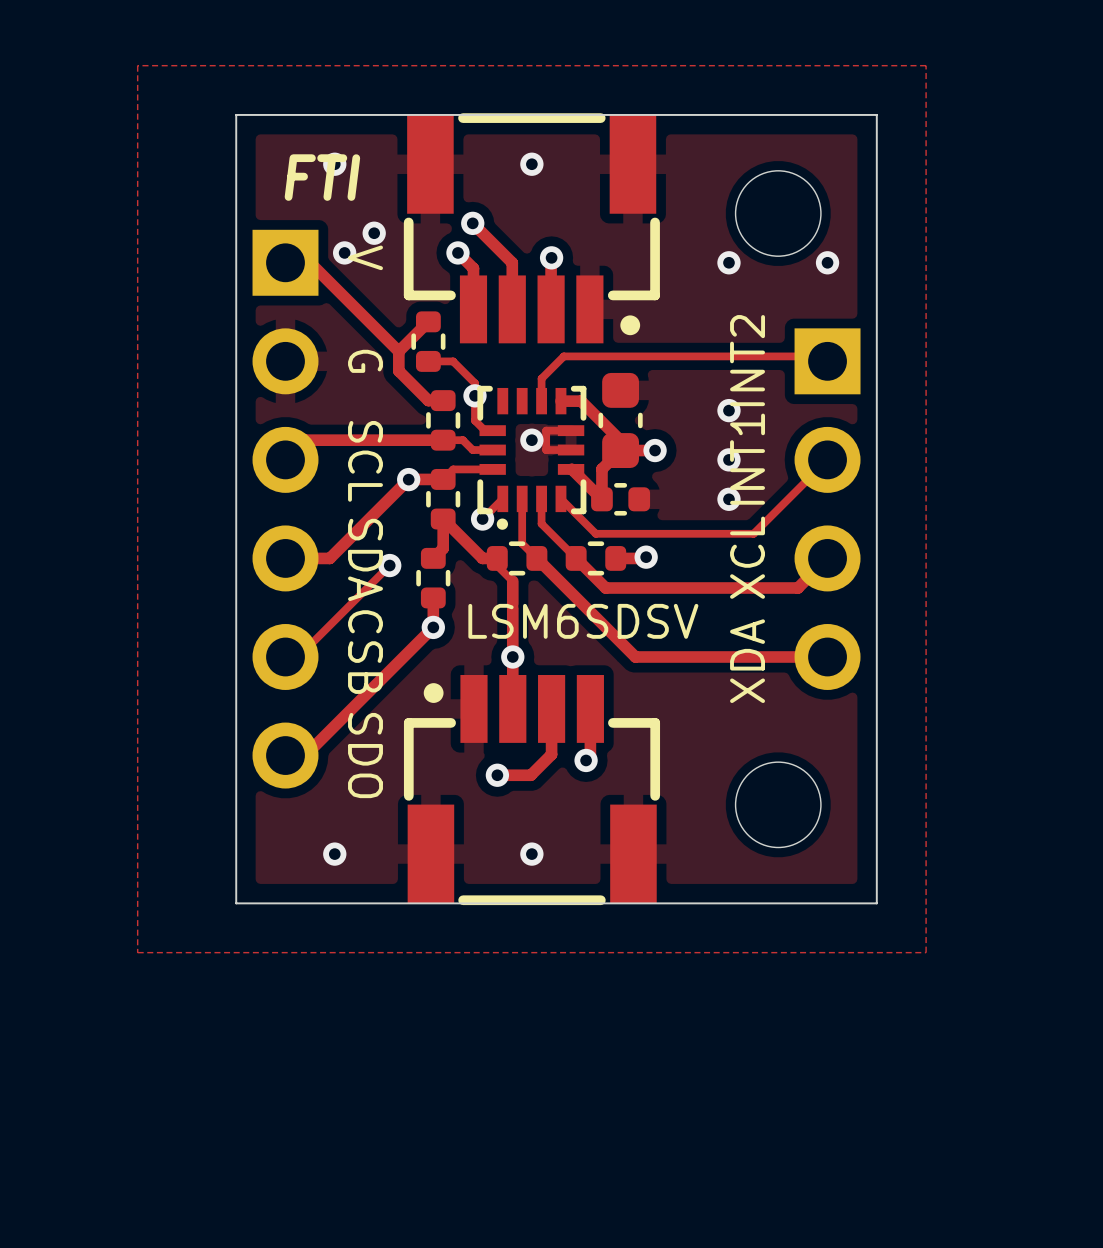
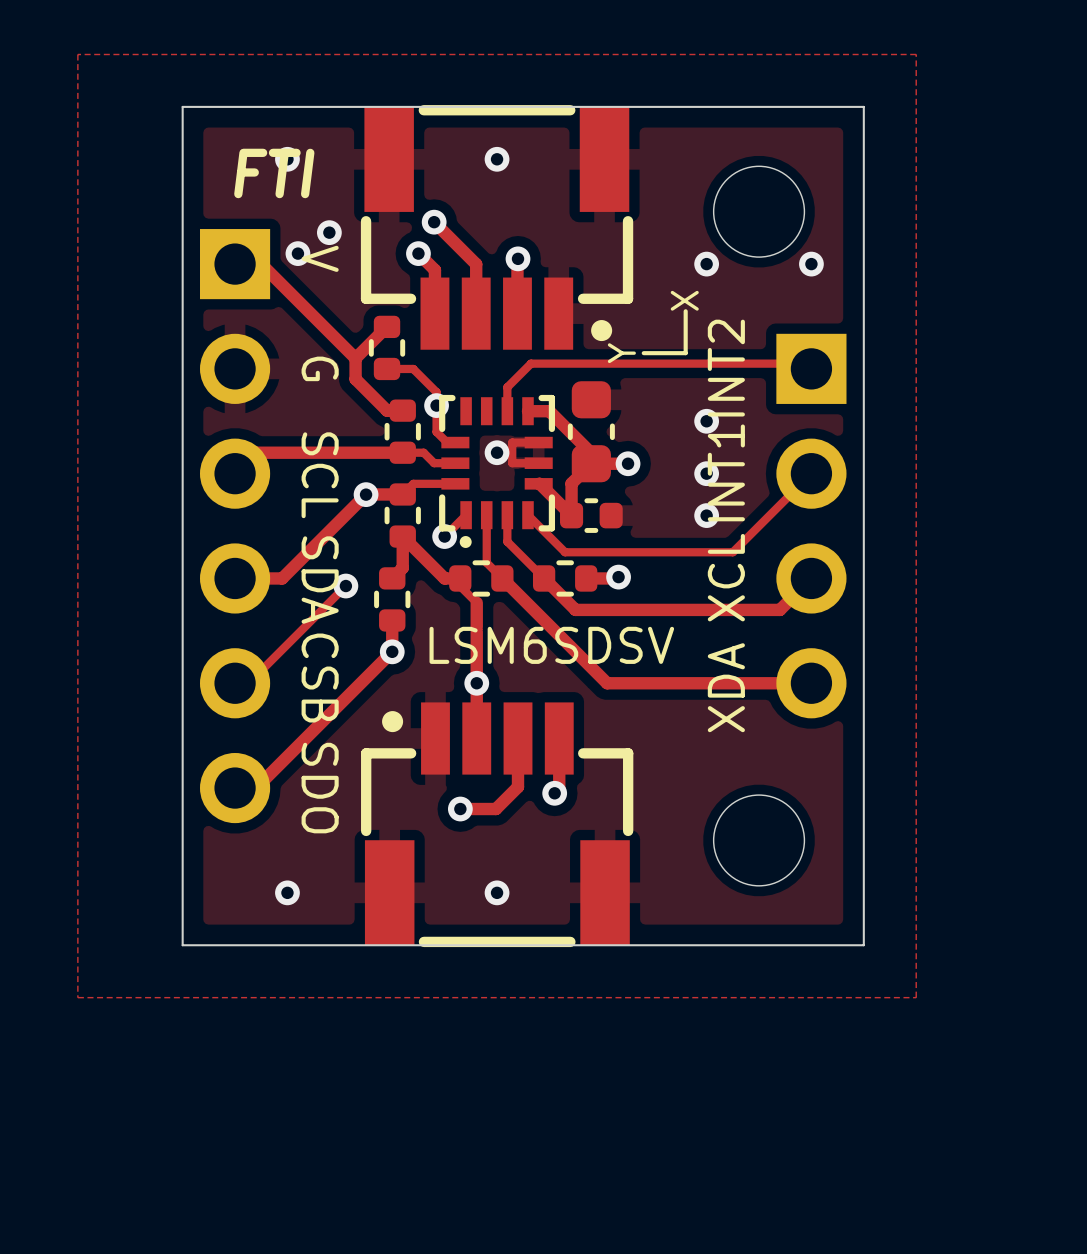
text: none -> X (684, 300)
line: none -> (685, 311) (685, 353) (643, 353)
text: none -> Y (621, 353)

